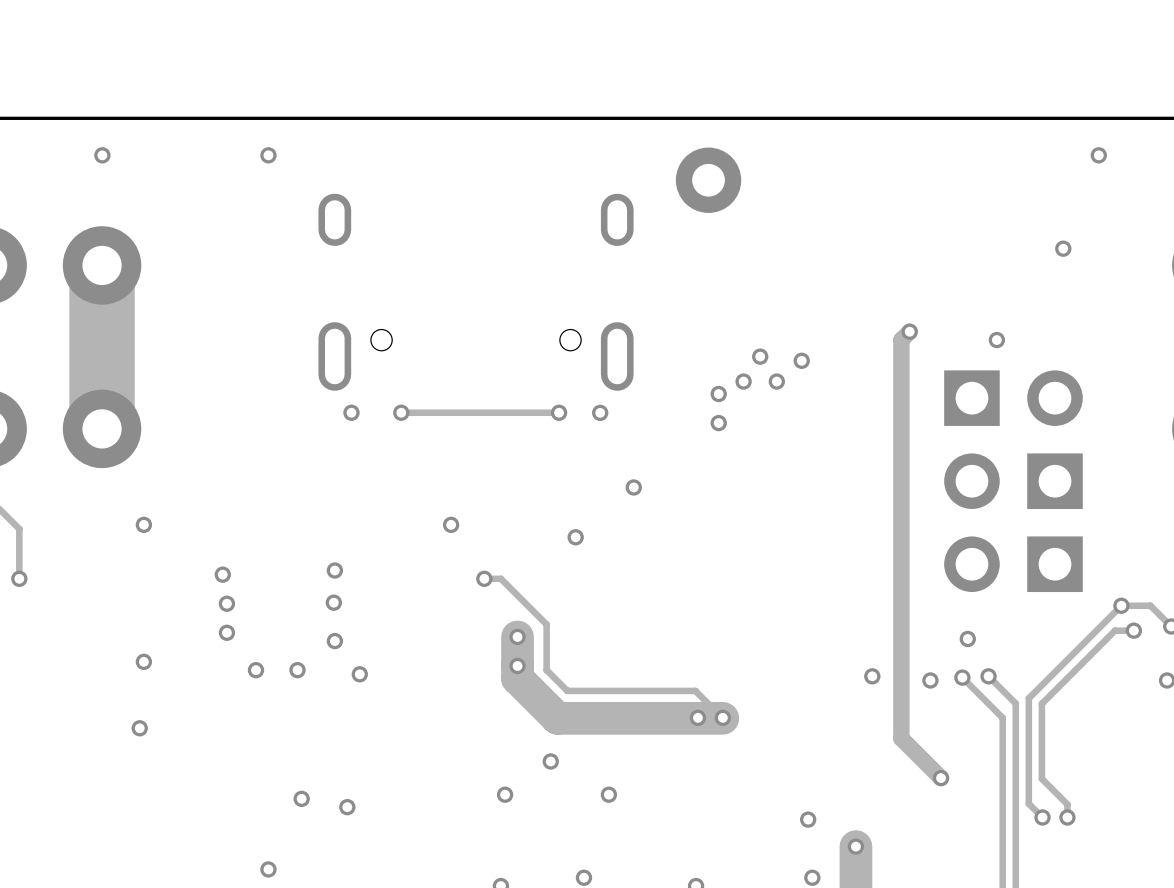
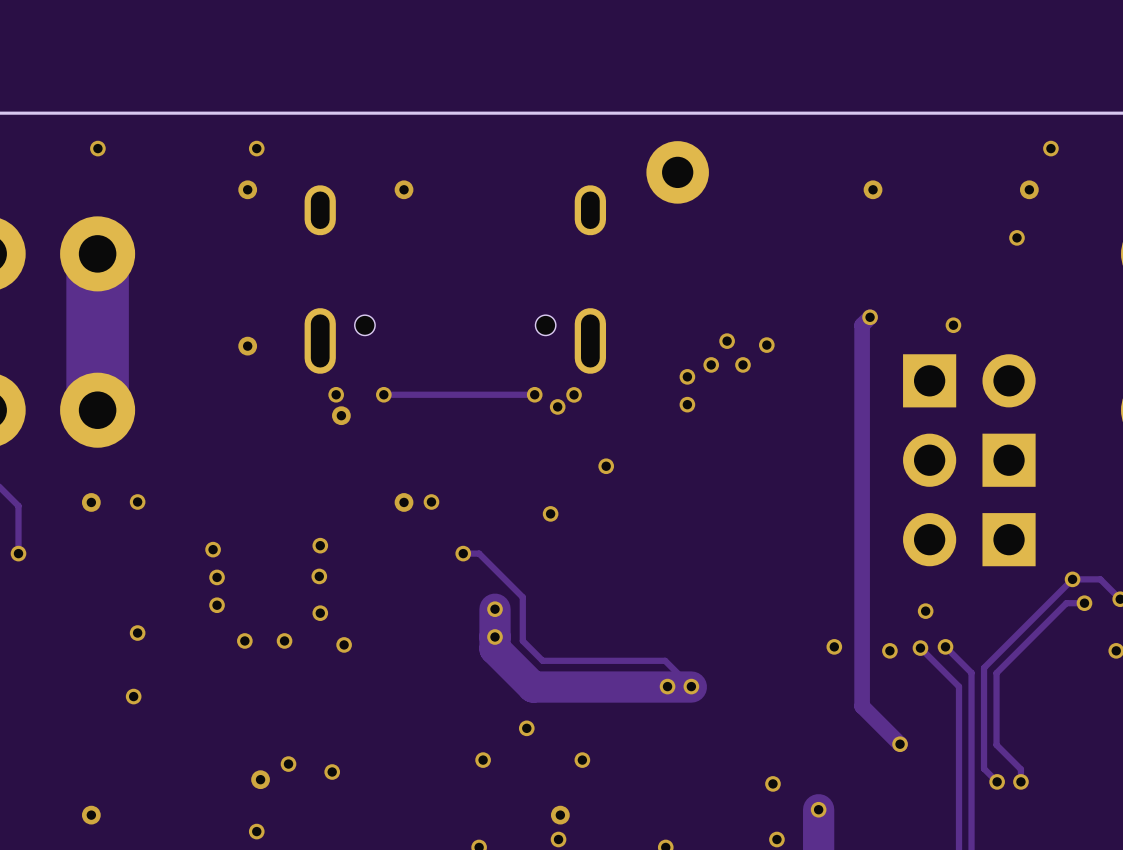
via: none -> (247, 189)
via: none -> (404, 189)
via: none -> (873, 189)
via: none -> (1029, 189)
via: none -> (247, 346)
via: none -> (557, 406)
via: none -> (341, 415)
via: none -> (91, 502)
via: none -> (404, 502)
via: none -> (260, 779)
via: none -> (91, 815)
via: none -> (560, 815)

